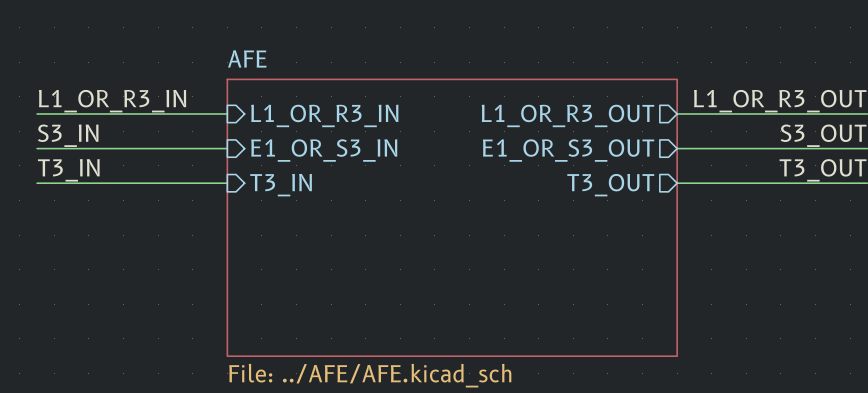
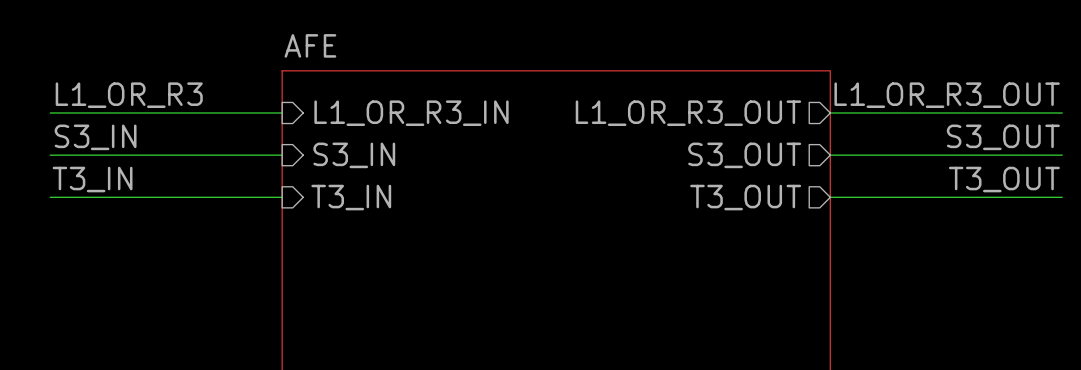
label: L1_OR_R3_IN (112, 101) -> L1_OR_R3 (129, 95)
sheet pin: E1_OR_S3_IN (324, 150) -> S3_IN (354, 155)
sheet pin: E1_OR_S3_OUT (568, 150) -> S3_OUT (744, 155)

